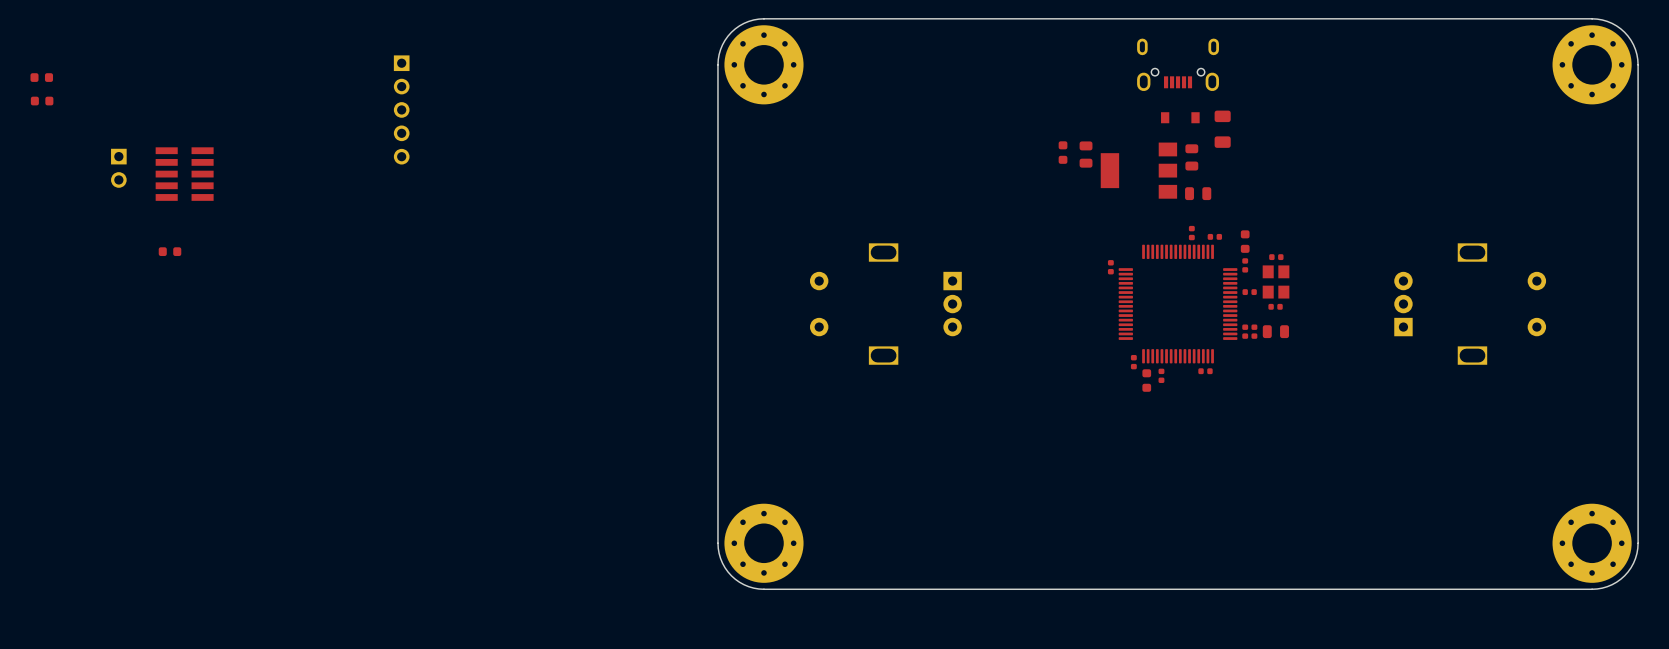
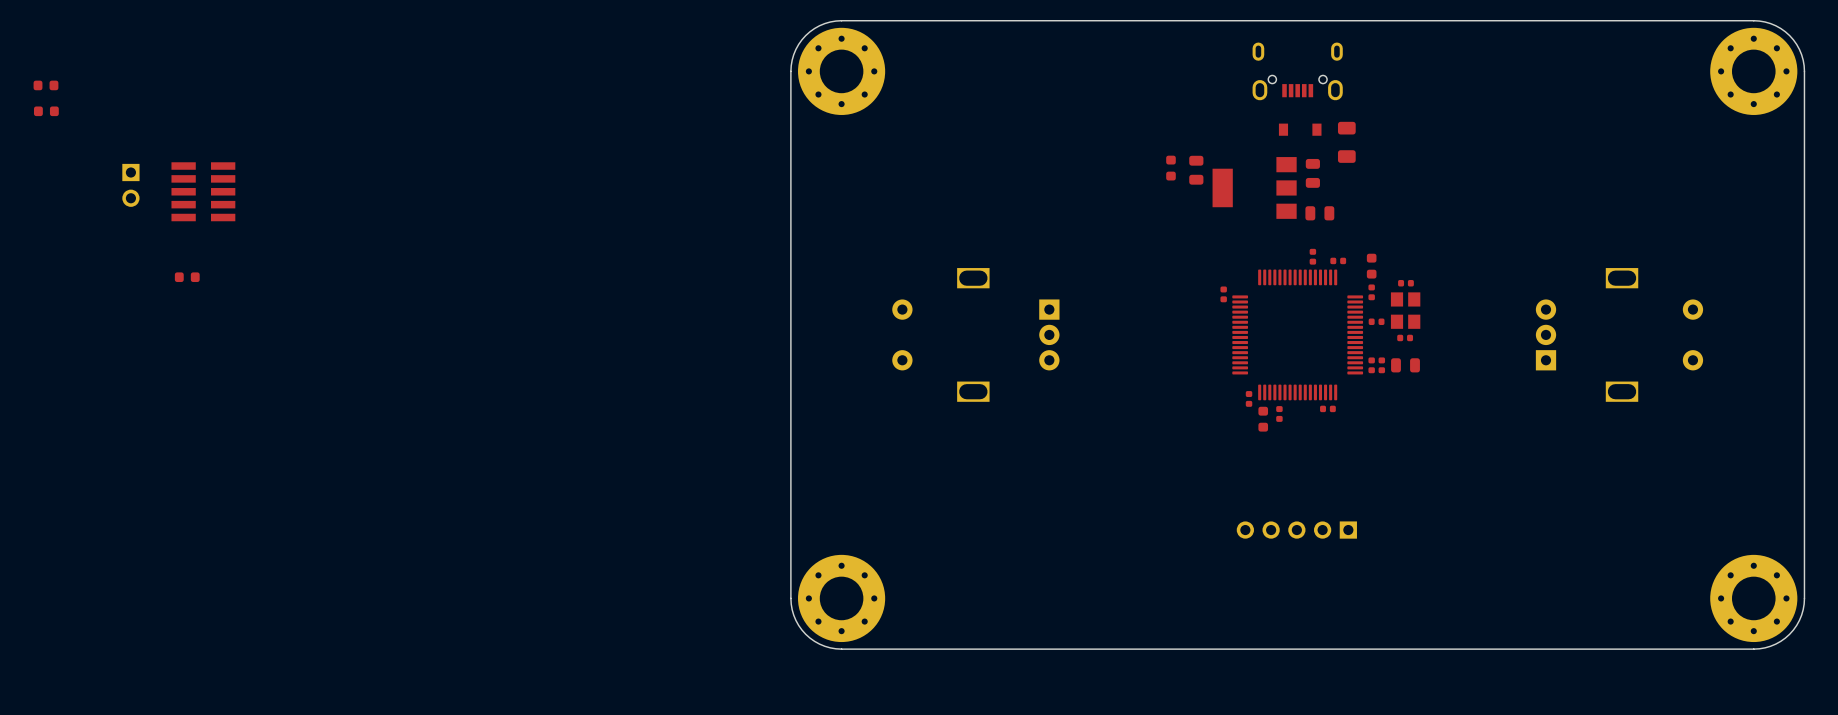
part: (401, 109) -> none
part: none -> (1296, 530)

